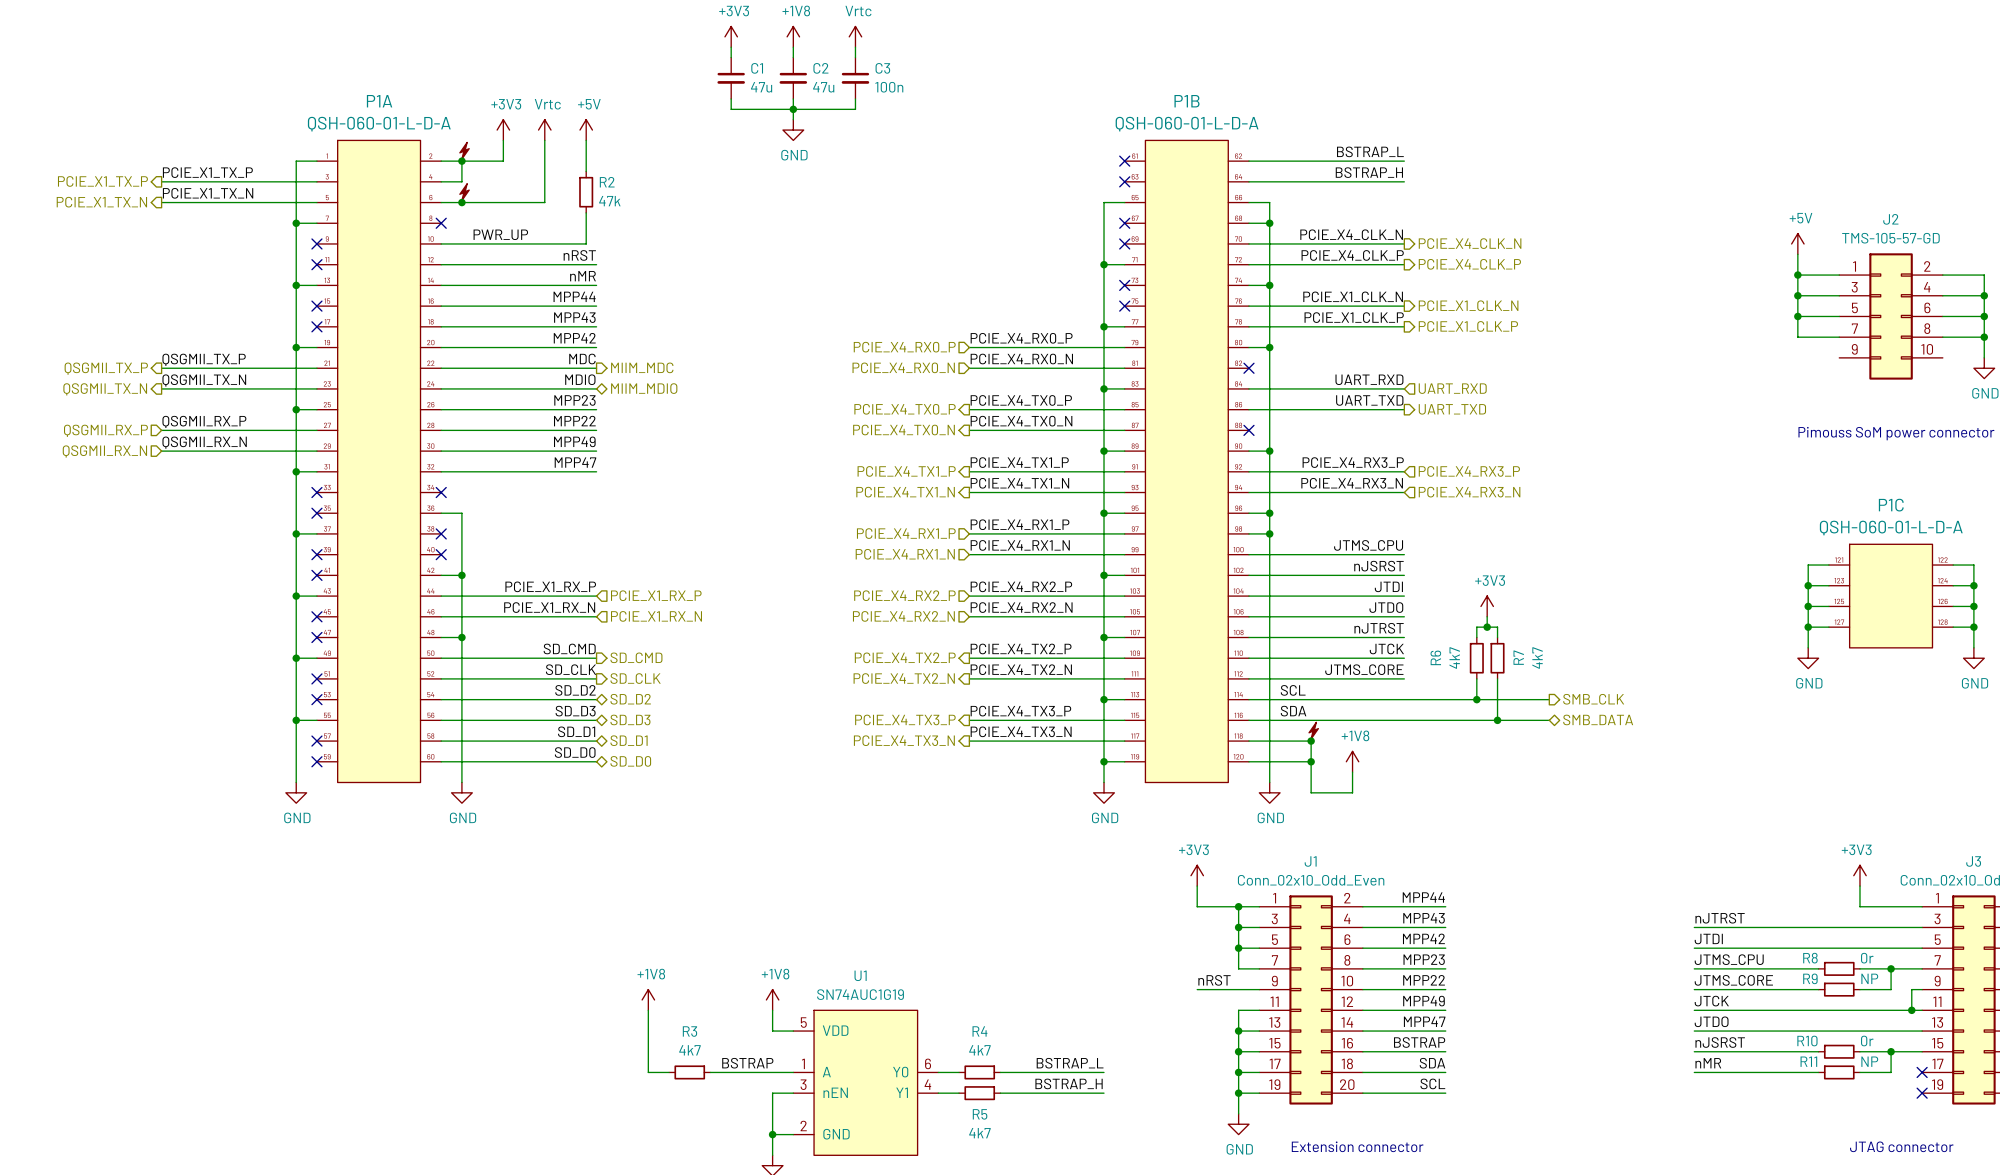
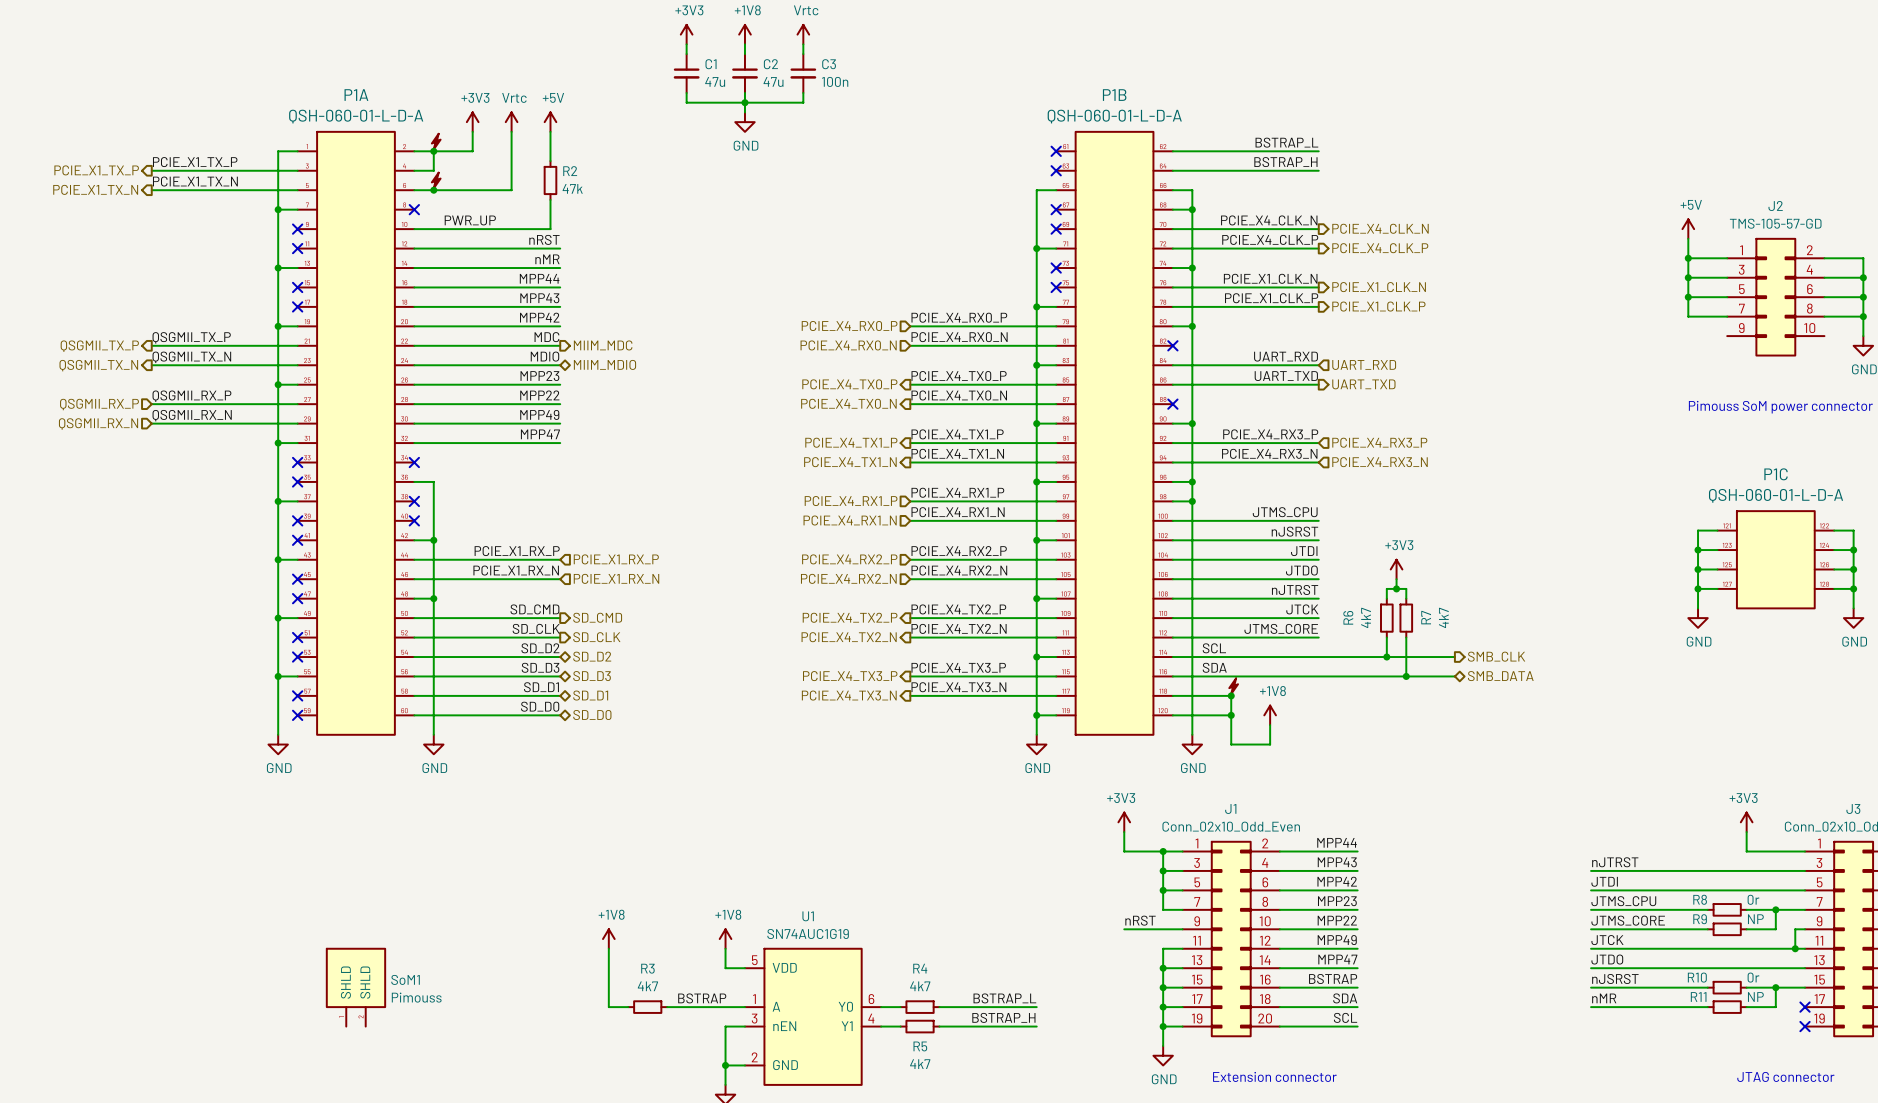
SoM1: none -> Pimouss (355, 987)

